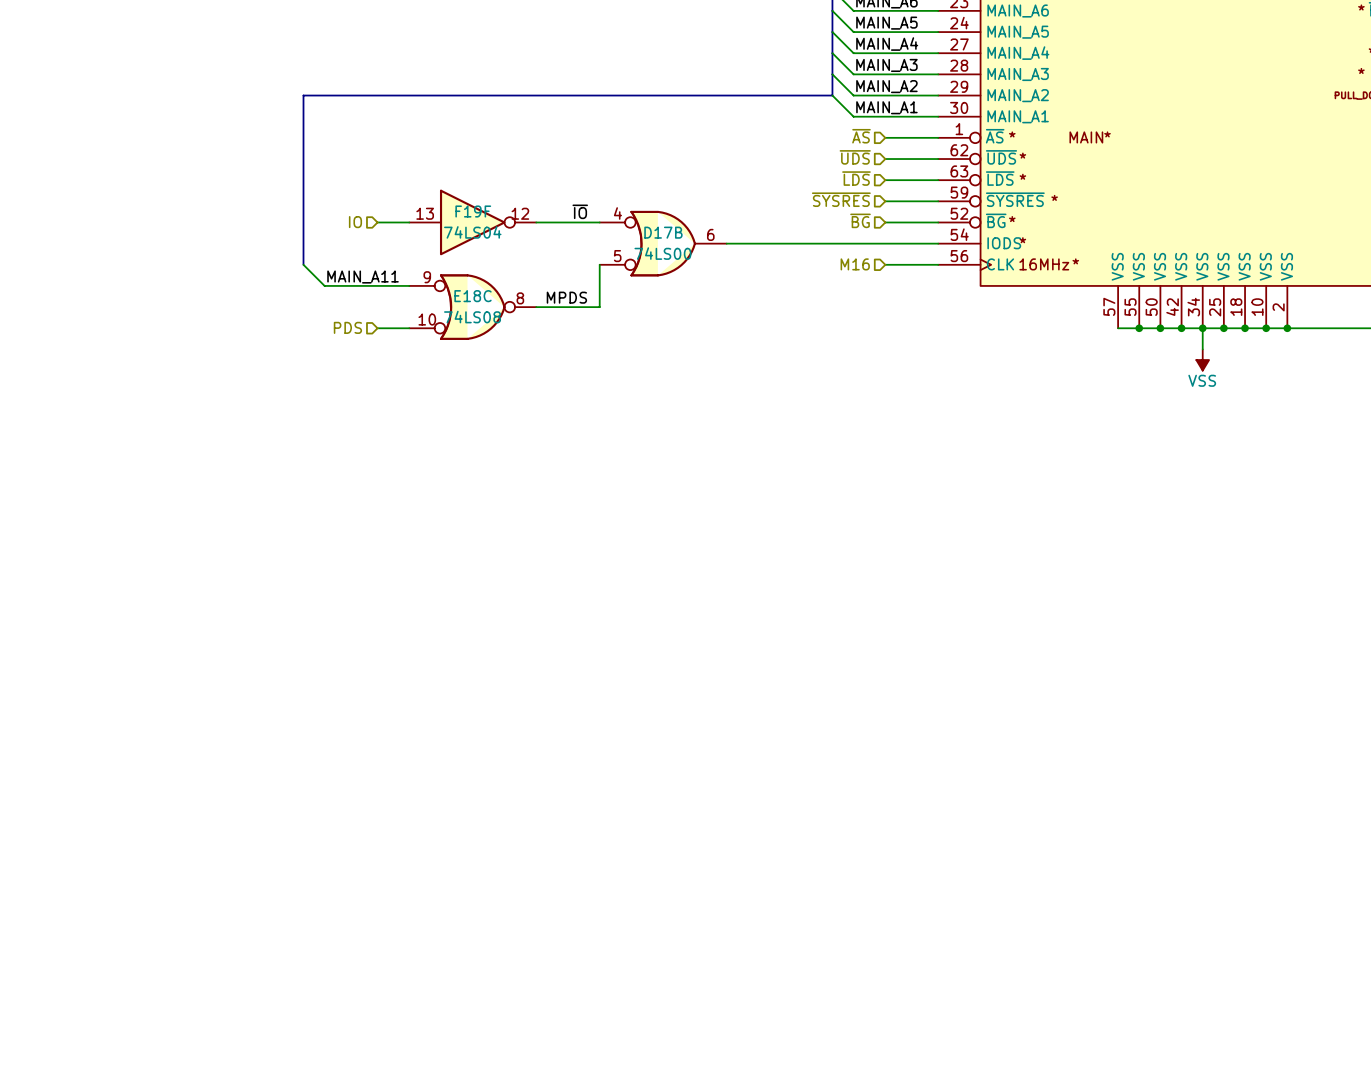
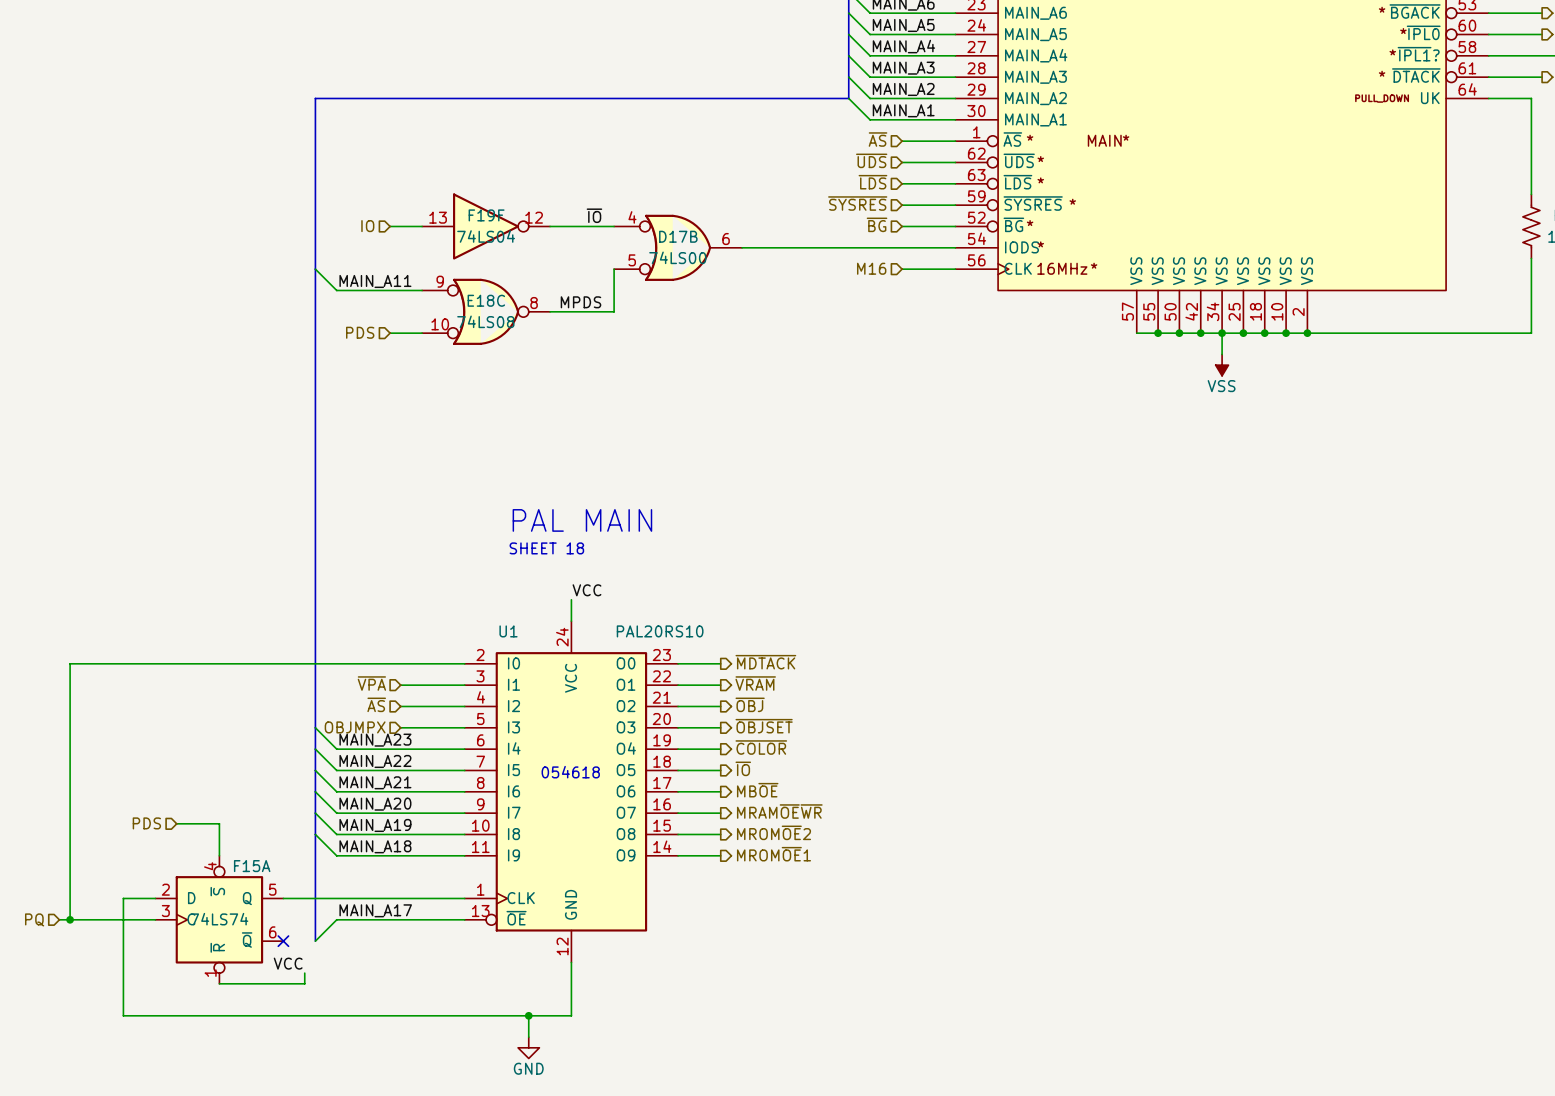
bus: none -> (315, 269) (315, 941)
text: none -> PAL MAIN (582, 520)
text: none -> SHEET 18 (546, 548)
label: none -> VCC (586, 590)
wire: none -> (571, 599) (571, 621)
hierarchical label: none -> ~{MDTACK} (765, 662)
wire: none -> (464, 663) (70, 663) (70, 919)
wire: none -> (678, 663) (720, 663)
hierarchical label: none -> ~{VPA} (371, 683)
hierarchical label: none -> ~{VRAM} (755, 683)
wire: none -> (400, 685) (464, 685)
wire: none -> (678, 685) (720, 685)
hierarchical label: none -> ~{AS} (376, 704)
hierarchical label: none -> ~{OBJ} (750, 704)
wire: none -> (400, 706) (464, 706)
wire: none -> (678, 706) (720, 706)
hierarchical label: none -> ~{OBJSET} (764, 726)
wire: none -> (315, 727) (336, 749) (464, 749)
hierarchical label: none -> OBJMPX (355, 727)
wire: none -> (400, 727) (464, 727)
wire: none -> (678, 727) (720, 727)
label: none -> MAIN_A23 (375, 740)
hierarchical label: none -> ~{COLOR} (761, 747)
wire: none -> (315, 749) (336, 770) (464, 770)
wire: none -> (678, 749) (720, 749)
label: none -> MAIN_A22 (375, 761)
hierarchical label: none -> ~{IO} (743, 768)
wire: none -> (315, 770) (336, 791) (464, 791)
wire: none -> (678, 770) (720, 770)
text: none -> 054618 (570, 772)
label: none -> MAIN_A21 (375, 782)
hierarchical label: none -> MB~{OE} (757, 790)
wire: none -> (315, 791) (336, 813) (464, 813)
U1: none -> PAL20RS10 (571, 791)
wire: none -> (678, 791) (720, 791)
label: none -> MAIN_A20 (375, 804)
hierarchical label: none -> MRAM~{OE}~{WR} (779, 811)
wire: none -> (315, 813) (336, 834) (464, 834)
wire: none -> (678, 813) (720, 813)
hierarchical label: none -> PDS (146, 823)
wire: none -> (176, 823) (219, 823) (219, 855)
label: none -> MAIN_A19 (375, 825)
hierarchical label: none -> MROM~{OE}2 (773, 832)
wire: none -> (315, 834) (336, 855) (464, 855)
wire: none -> (678, 834) (720, 834)
label: none -> MAIN_A18 (375, 846)
hierarchical label: none -> MROM~{OE}1 (773, 854)
wire: none -> (678, 855) (720, 855)
wire: none -> (155, 898) (123, 898) (123, 1015) (571, 1015) (571, 962)
wire: none -> (283, 898) (464, 898)
label: none -> MAIN_A17 (375, 910)
hierarchical label: none -> PQ (34, 919)
wire: none -> (59, 919) (155, 919)
junction: none -> (70, 919)
F15A: none -> 74LS74 (219, 919)
wire: none -> (464, 919) (336, 919) (315, 941)
no-connect mark: none -> (283, 941)
label: none -> VCC (288, 963)
wire: none -> (304, 973) (304, 983) (219, 983)
wire: none -> (528, 1015) (528, 1037)
junction: none -> (528, 1015)
power symbol: none -> GND (528, 1047)

